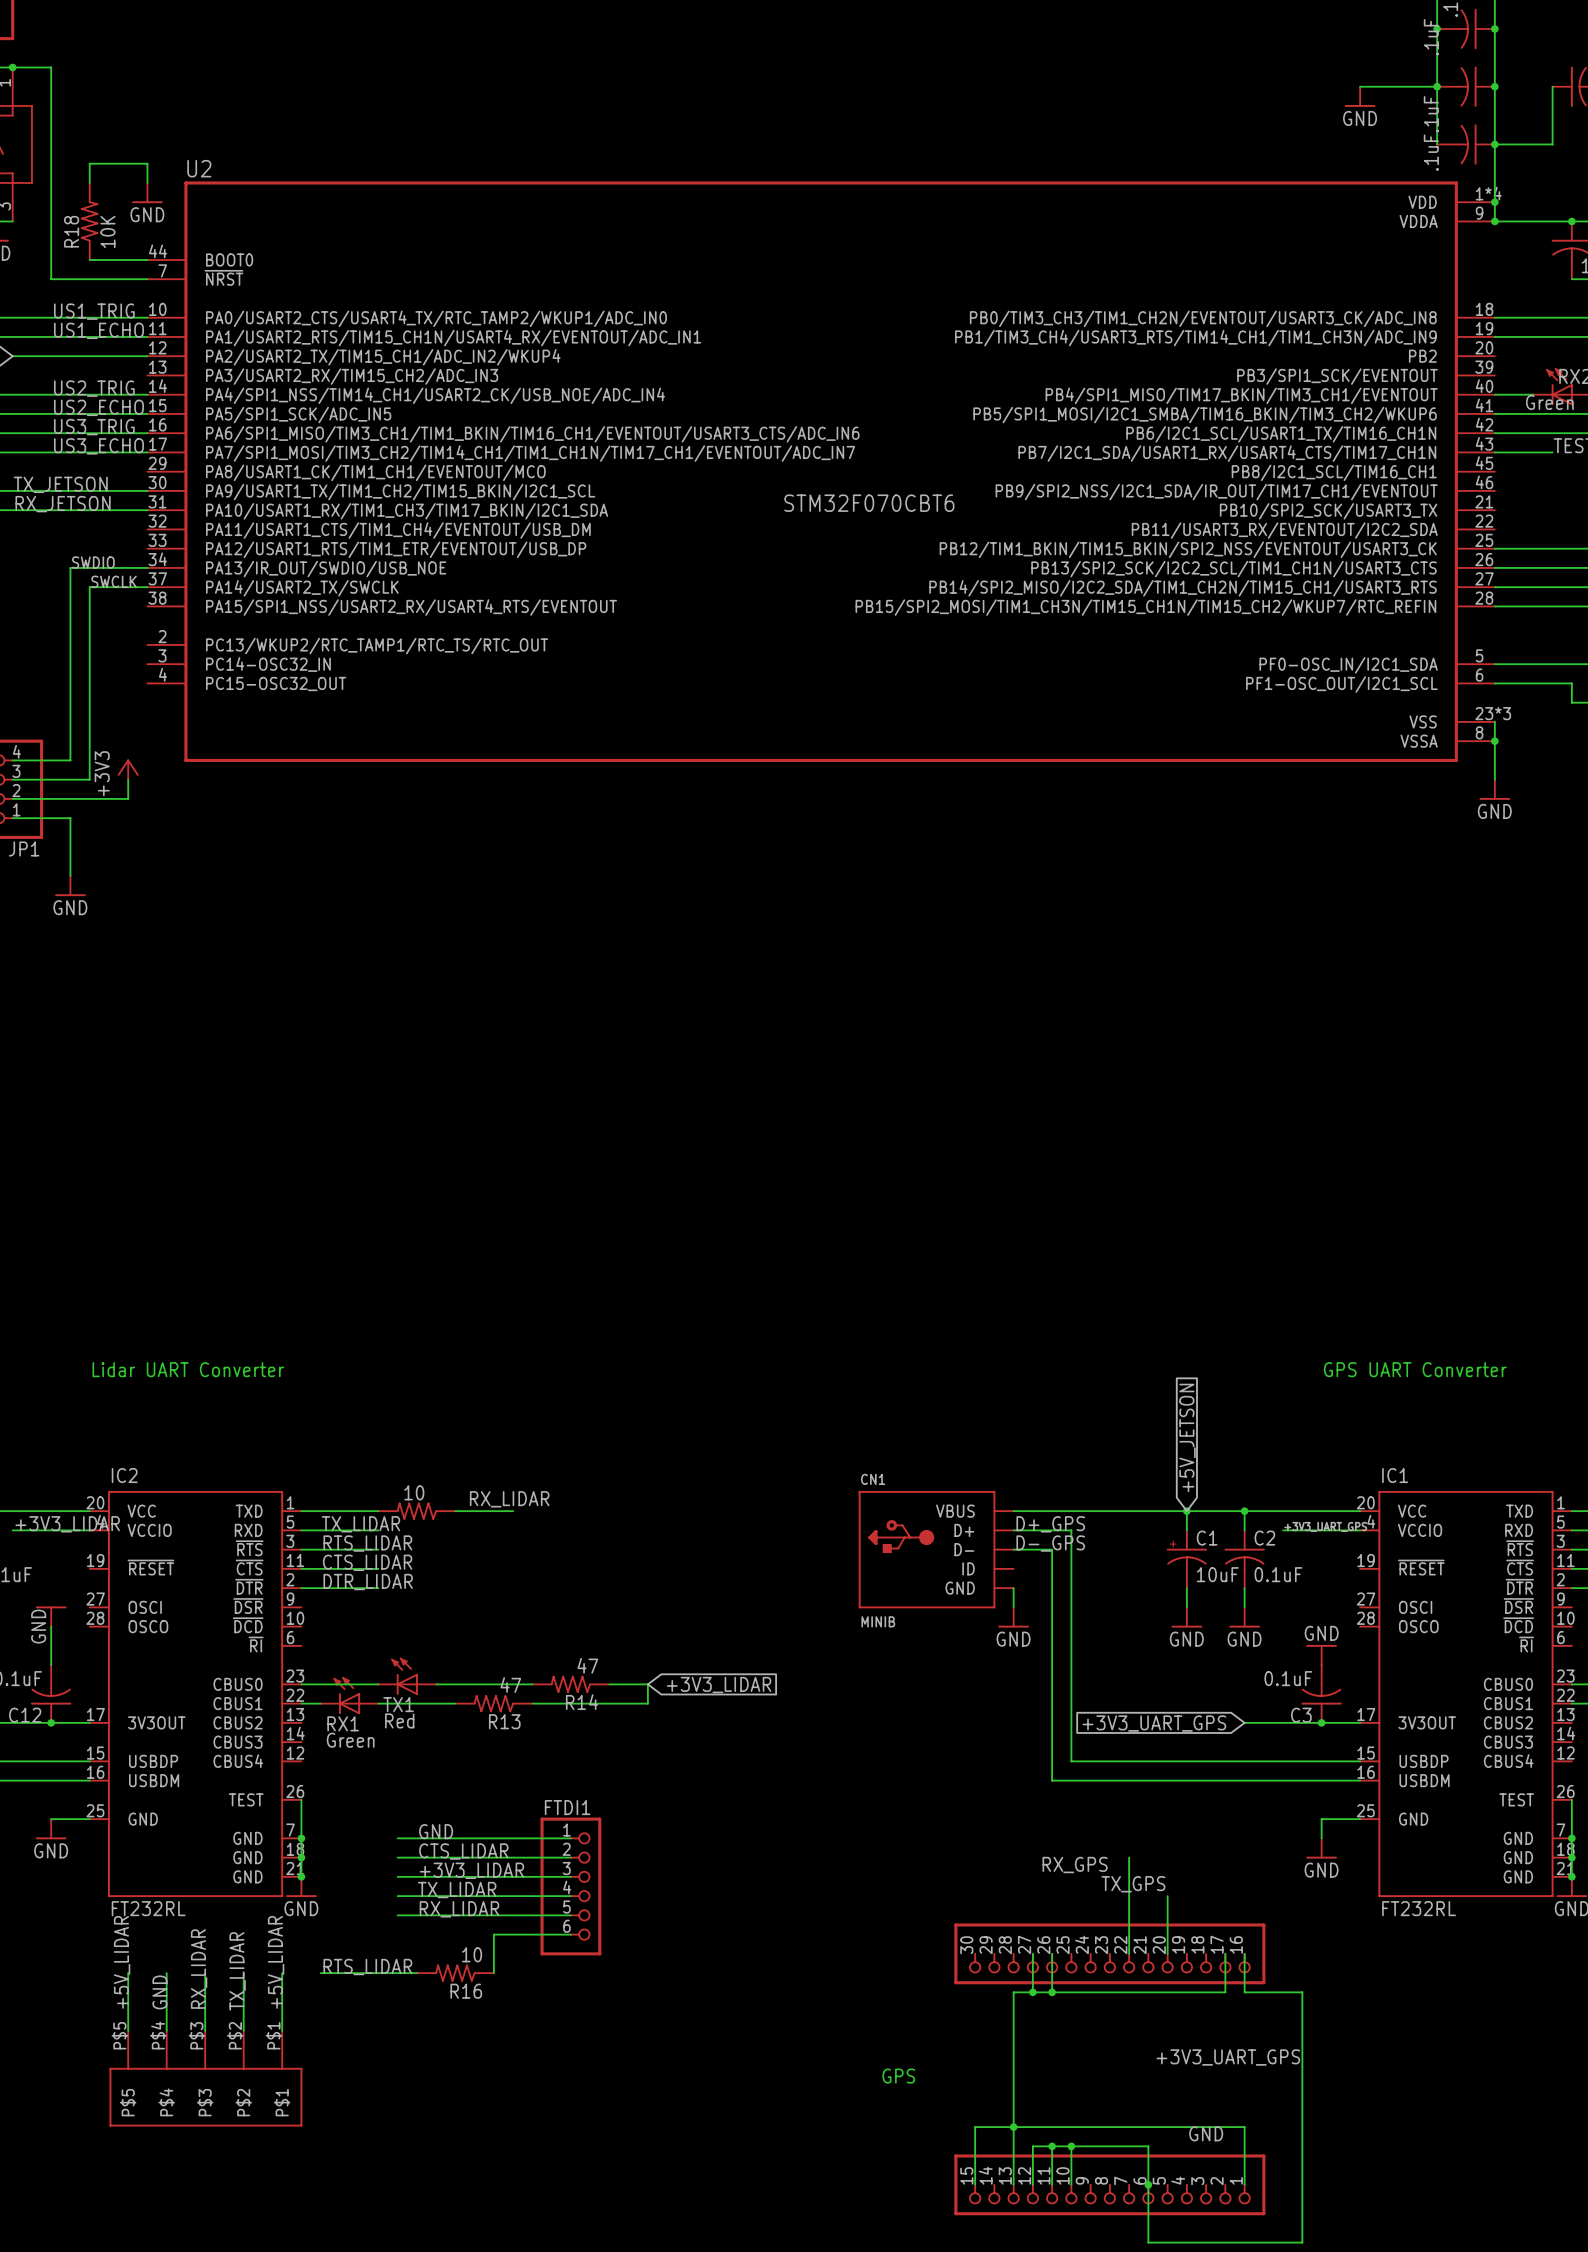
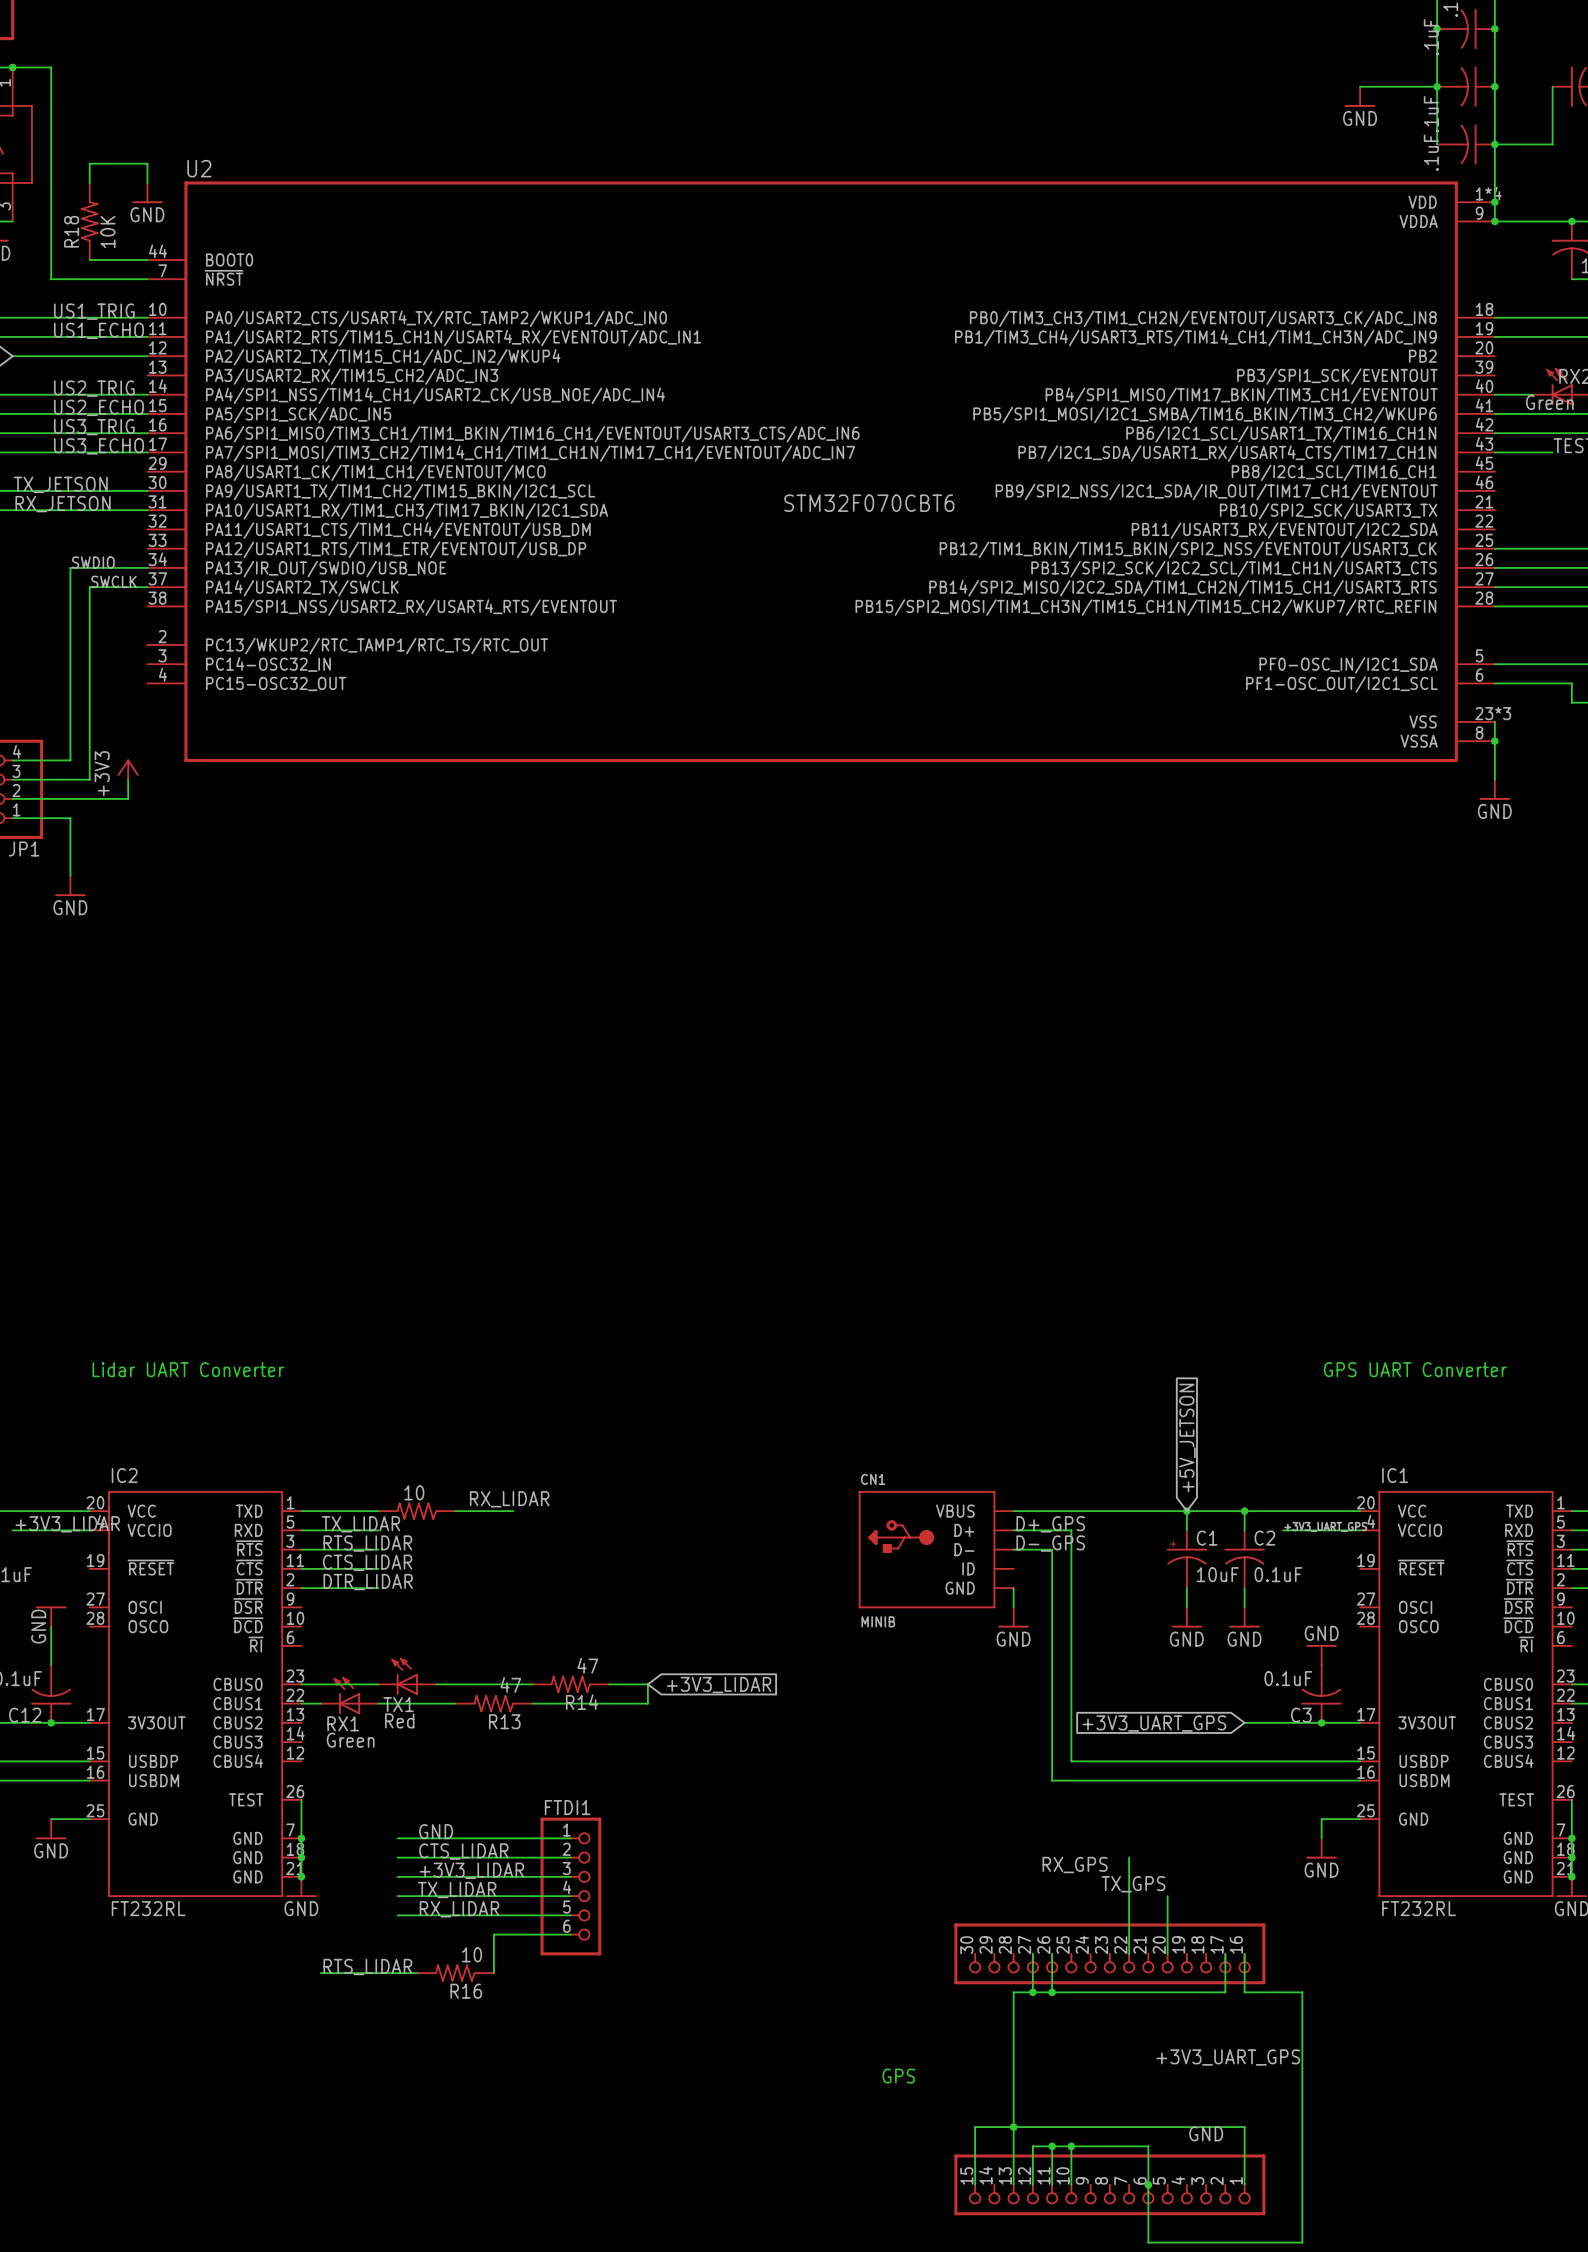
label: +5V_LIDAR (122, 1962) -> none
label: +5V_LIDAR (276, 1962) -> none
label: RX_LIDAR (199, 1969) -> none
label: TX_LIDAR (237, 1971) -> none
wire: (128, 1973) (128, 2030) -> none
wire: (166, 1973) (166, 2030) -> none
wire: (205, 1973) (205, 2030) -> none
wire: (243, 1973) (243, 2030) -> none
wire: (282, 1973) (282, 2030) -> none
label: GND (159, 1992) -> none
part: (205, 2078) -> none

